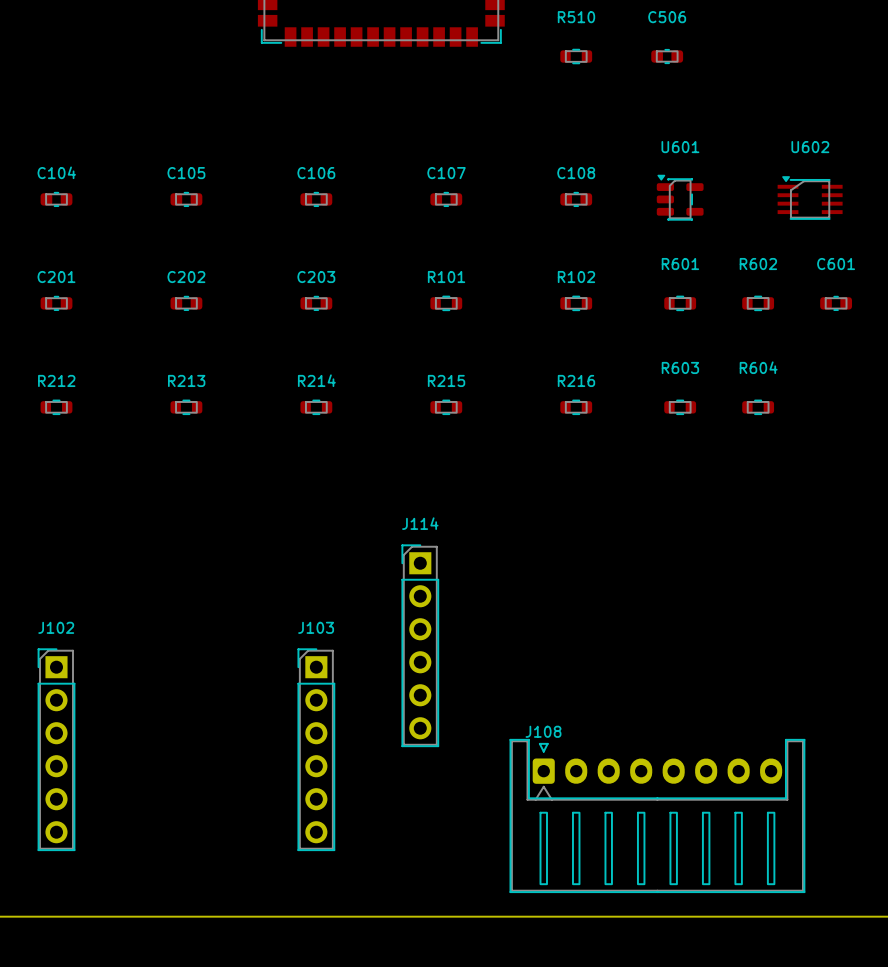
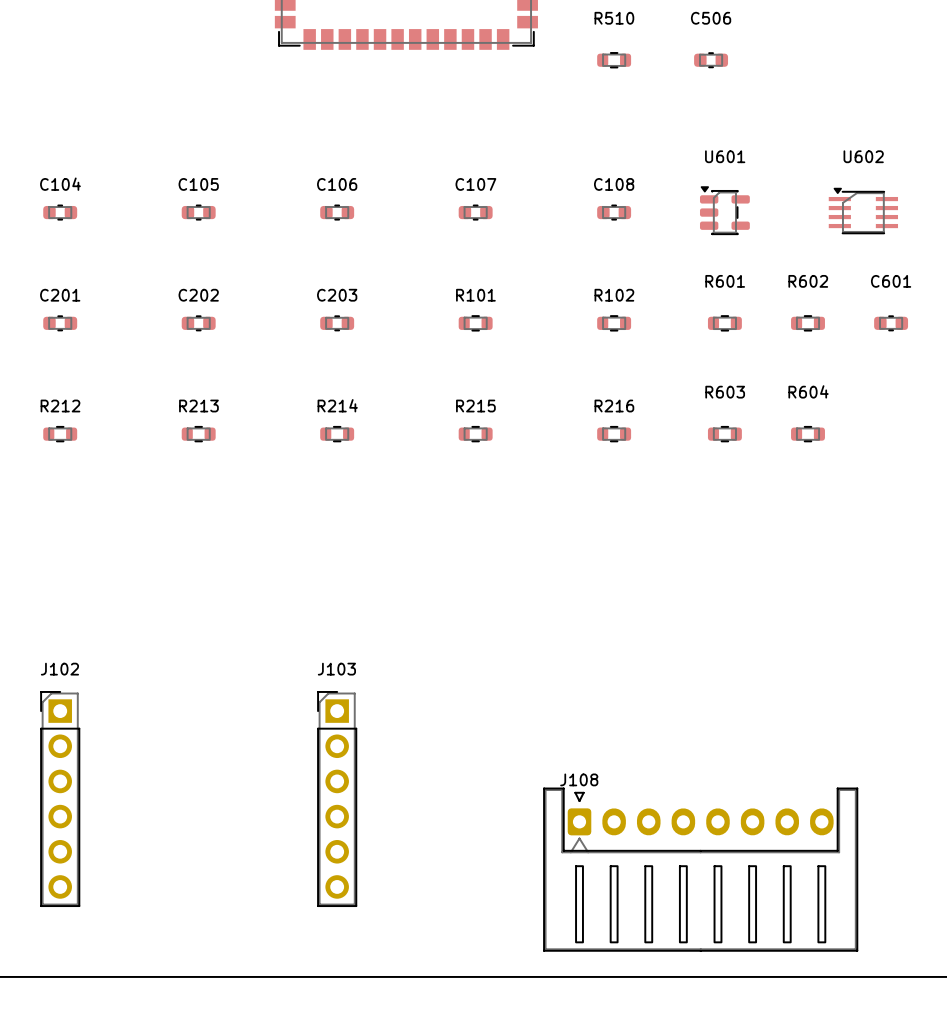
J114: (420, 645) -> none

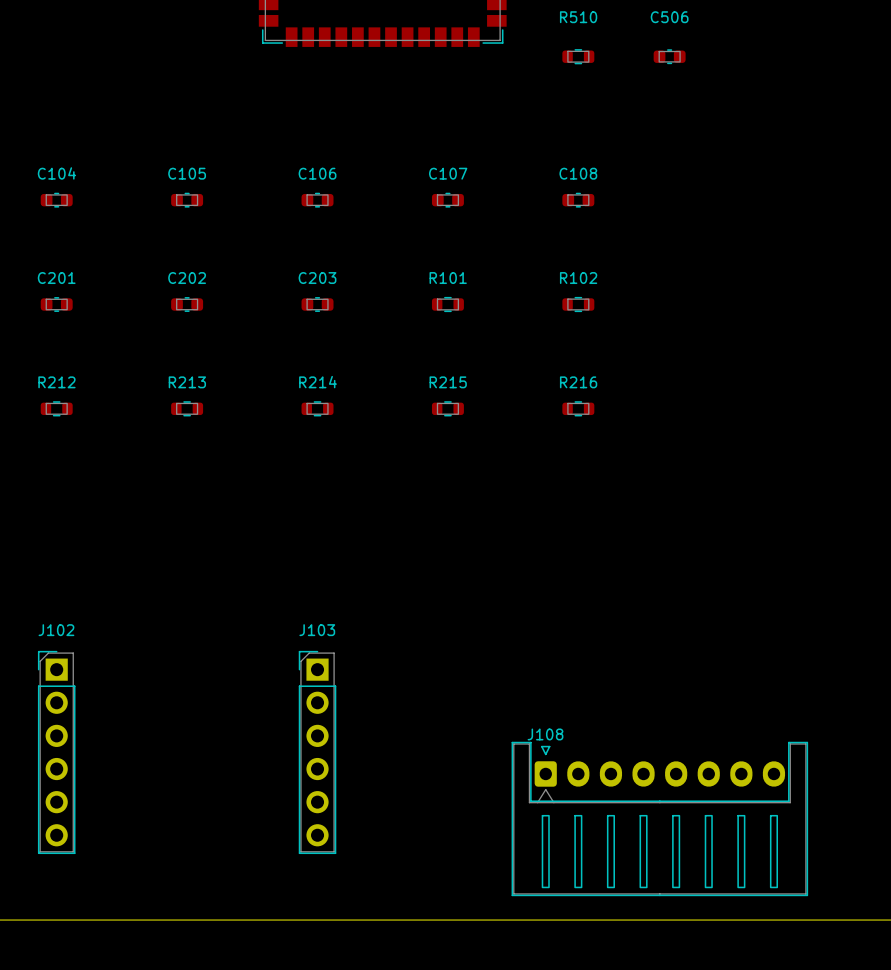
U601: (724, 210) -> none
U602: (863, 210) -> none
R601: (724, 323) -> none
R602: (808, 323) -> none
C601: (891, 323) -> none
R603: (724, 434) -> none
R604: (808, 434) -> none

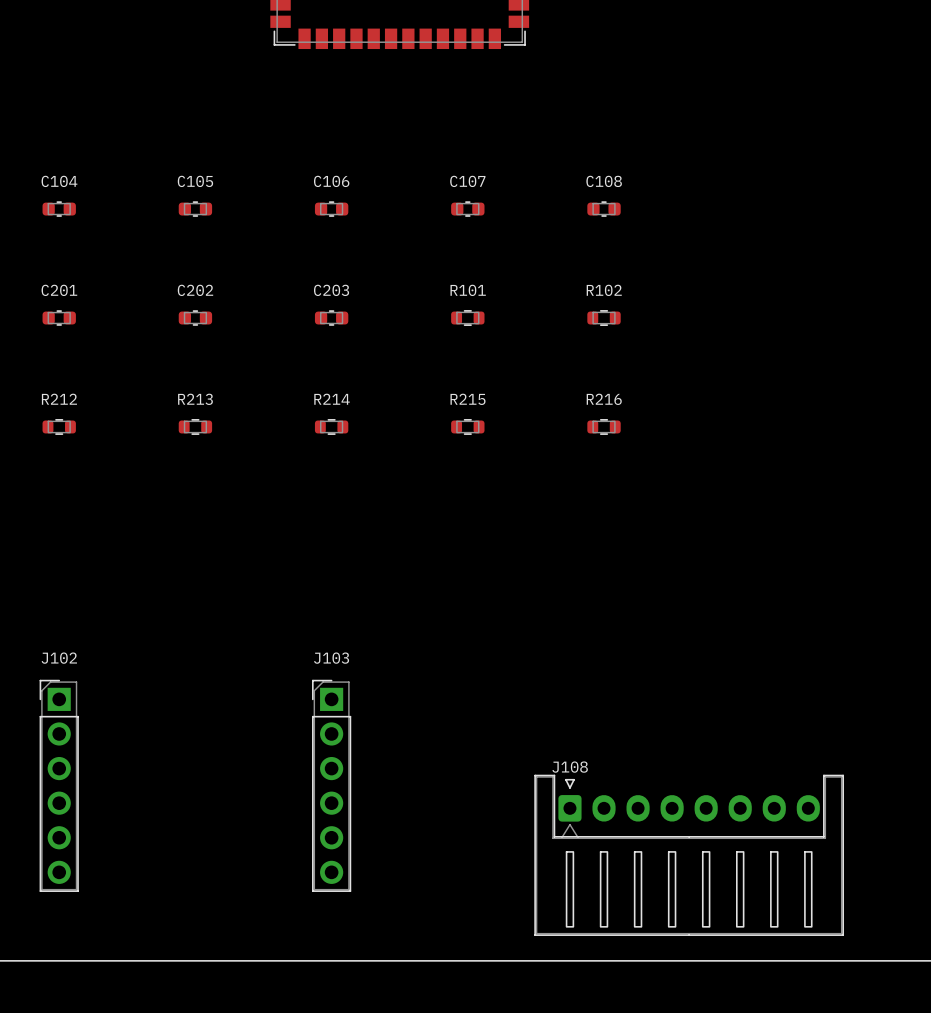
R510: (578, 56) -> none
C506: (669, 56) -> none

